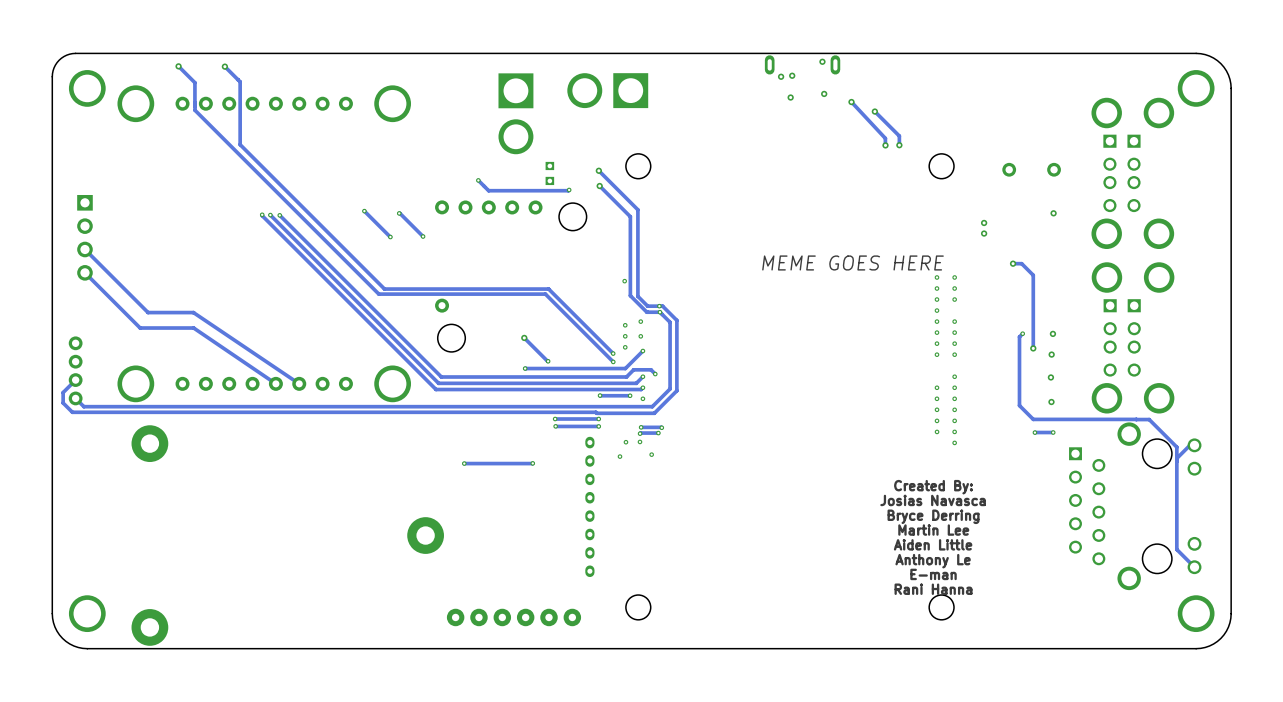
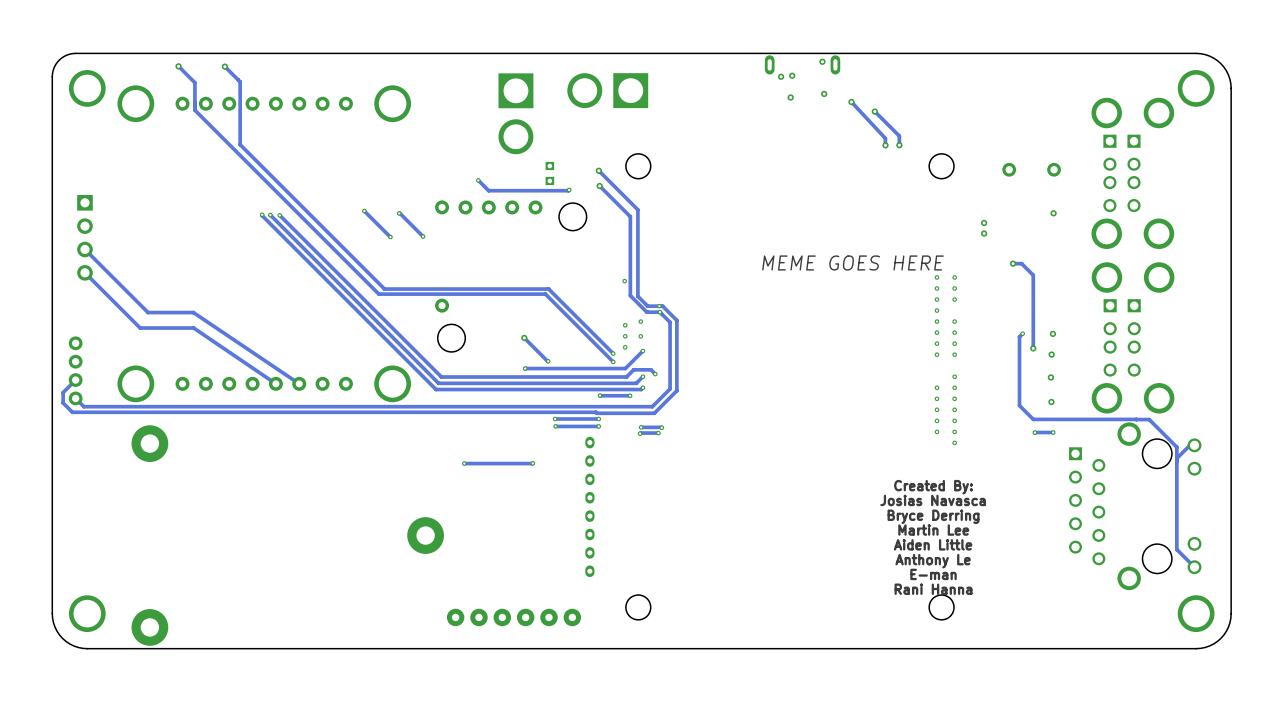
via: (642, 398) -> none
via: (639, 441) -> none
via: (625, 442) -> none
via: (651, 454) -> none
via: (619, 456) -> none

